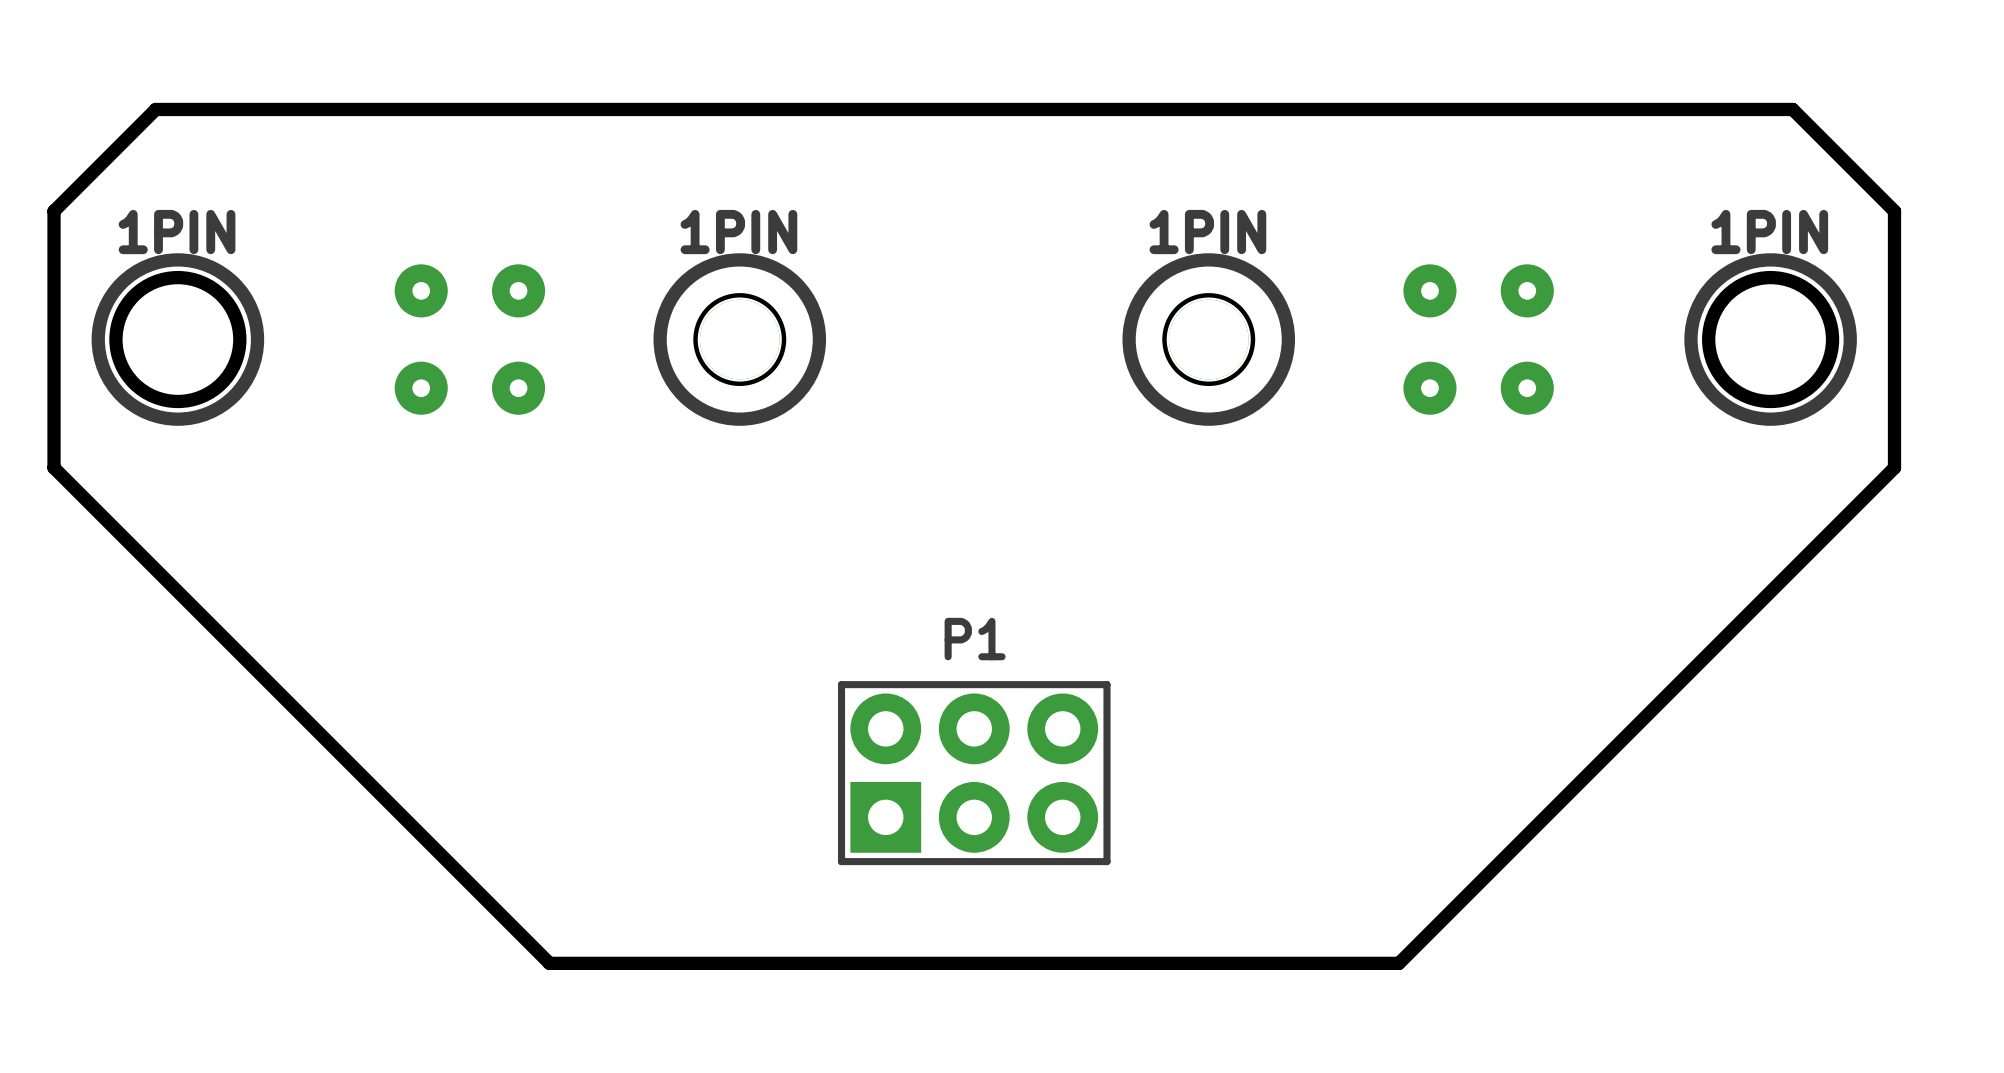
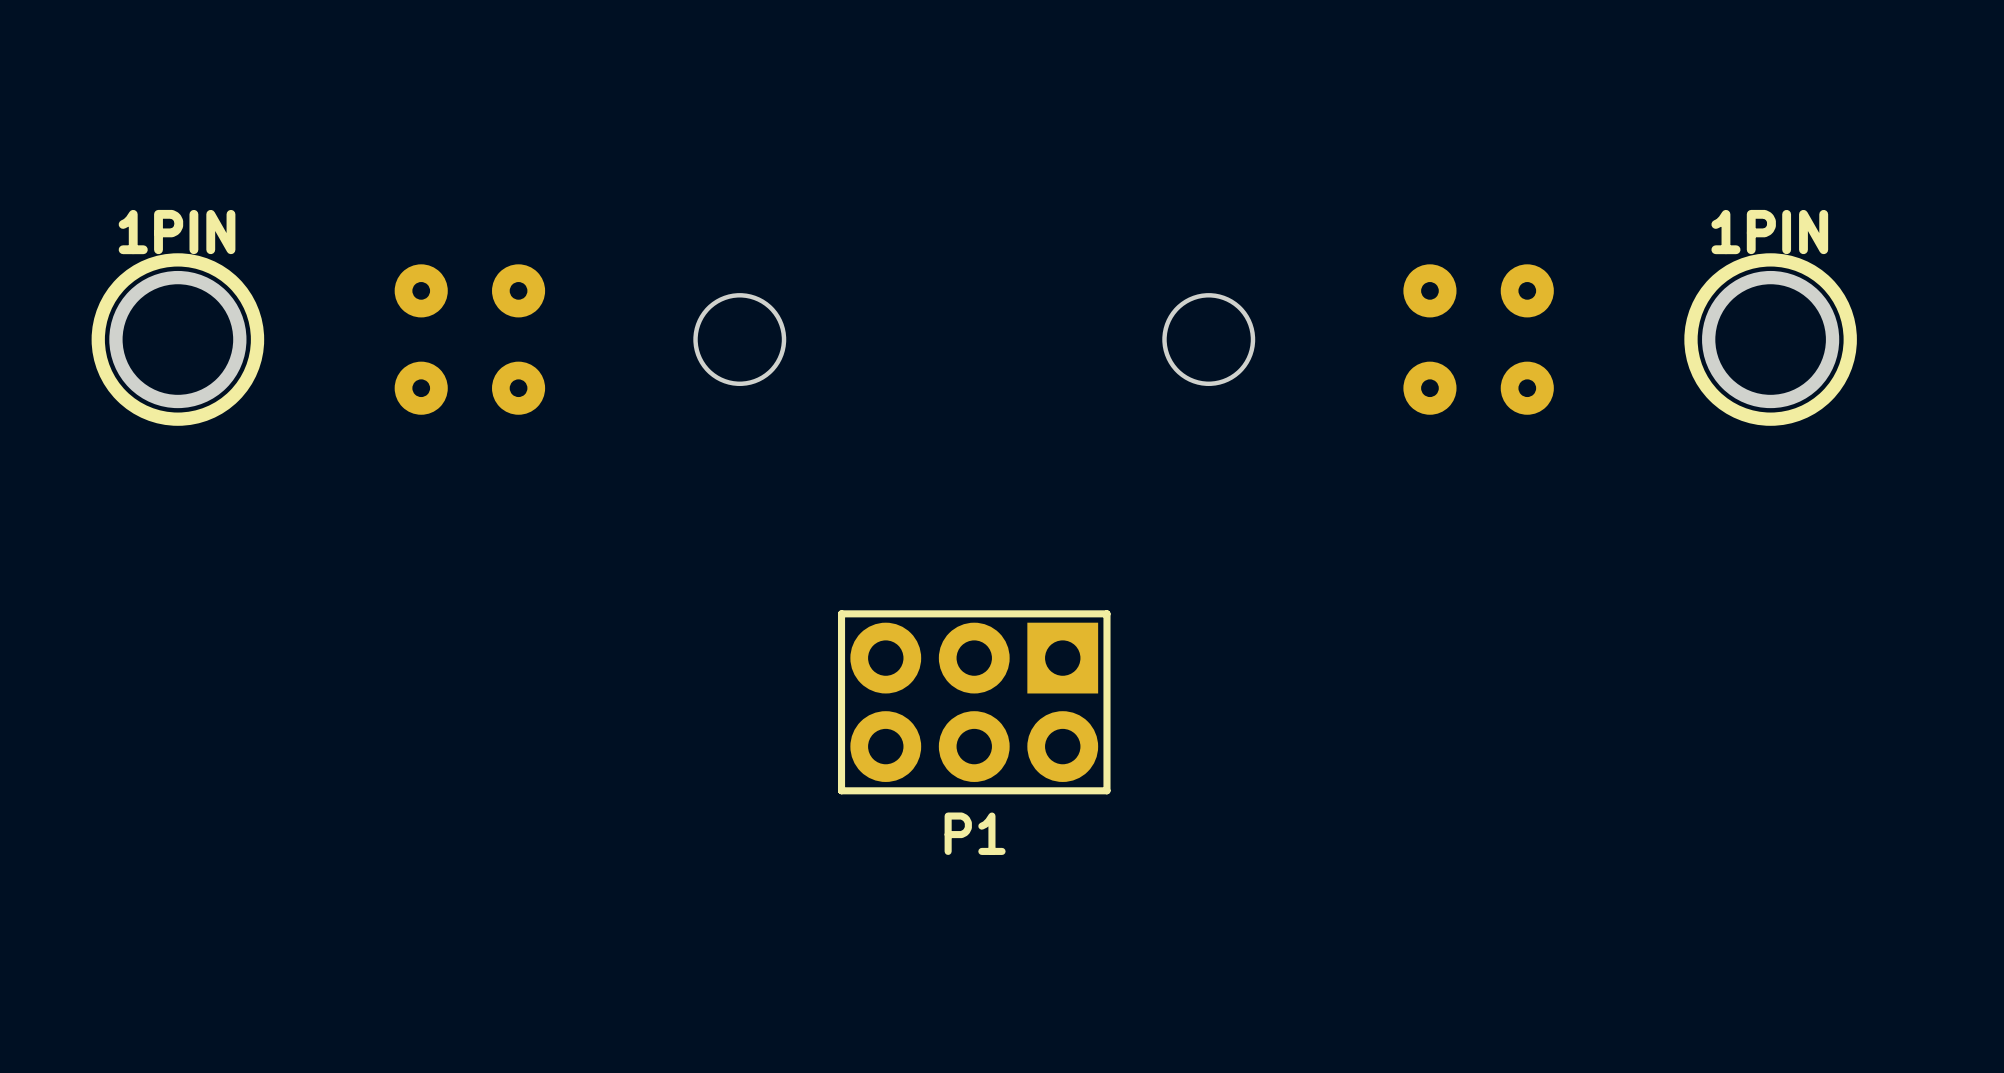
board edge: (155, 109) (54, 211) (54, 467) (549, 963) (1398, 963) (1894, 467) (1894, 211) (1792, 109) (155, 109) -> none
1PIN: (739, 339) -> none
1PIN: (1208, 339) -> none
P1 rotation: 0° (974, 773) -> 180° (974, 702)

